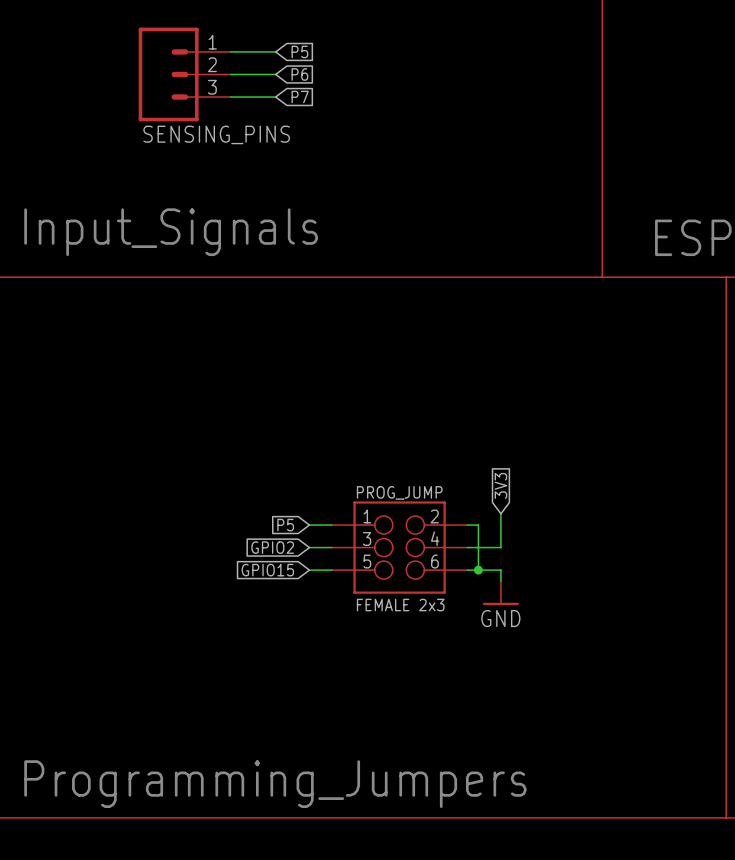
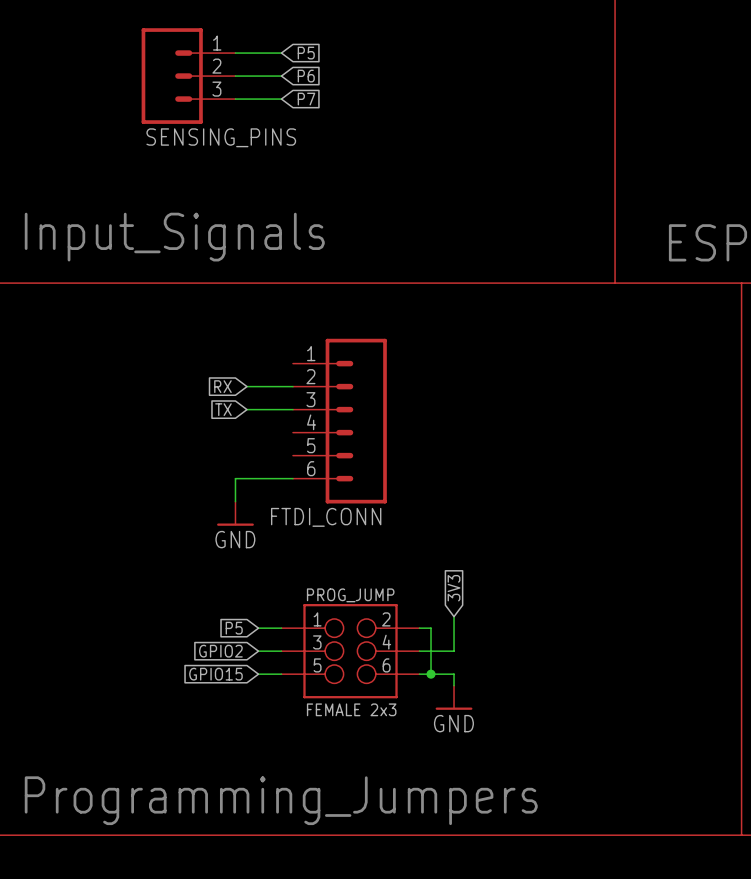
global label: none -> RX (222, 386)
wire: none -> (246, 386) (292, 386)
global label: none -> TX (223, 409)
wire: none -> (246, 409) (292, 409)
FTDI_CONN: none -> (339, 421)
wire: none -> (292, 478) (235, 478) (235, 501)
global label position: 3V3 (500, 485) -> 3V3 (454, 588)
power symbol: none -> GND (235, 513)
wire: (500, 513) (500, 547) (467, 547) -> (454, 616) (454, 651) (419, 651)
global label position: P5 (285, 525) -> P5 (234, 628)
wire: (309, 525) (331, 525) -> (258, 628) (281, 628)
wire: (467, 525) (478, 525) (478, 570) -> (419, 628) (431, 628) (431, 674)
global label position: GPIO2 (272, 547) -> GPIO2 (220, 651)
wire: (309, 547) (331, 547) -> (258, 651) (281, 651)
PROG_JUMP position: (399, 547) -> (350, 651)
global label position: GPIO15 (267, 570) -> GPIO15 (215, 674)
wire: (309, 570) (331, 570) -> (258, 674) (281, 674)
wire: (467, 570) (500, 570) (500, 581) -> (419, 674) (454, 674) (454, 685)
junction: (478, 570) -> none
power symbol position: GND (500, 593) -> GND (454, 697)
junction: none -> (431, 674)

